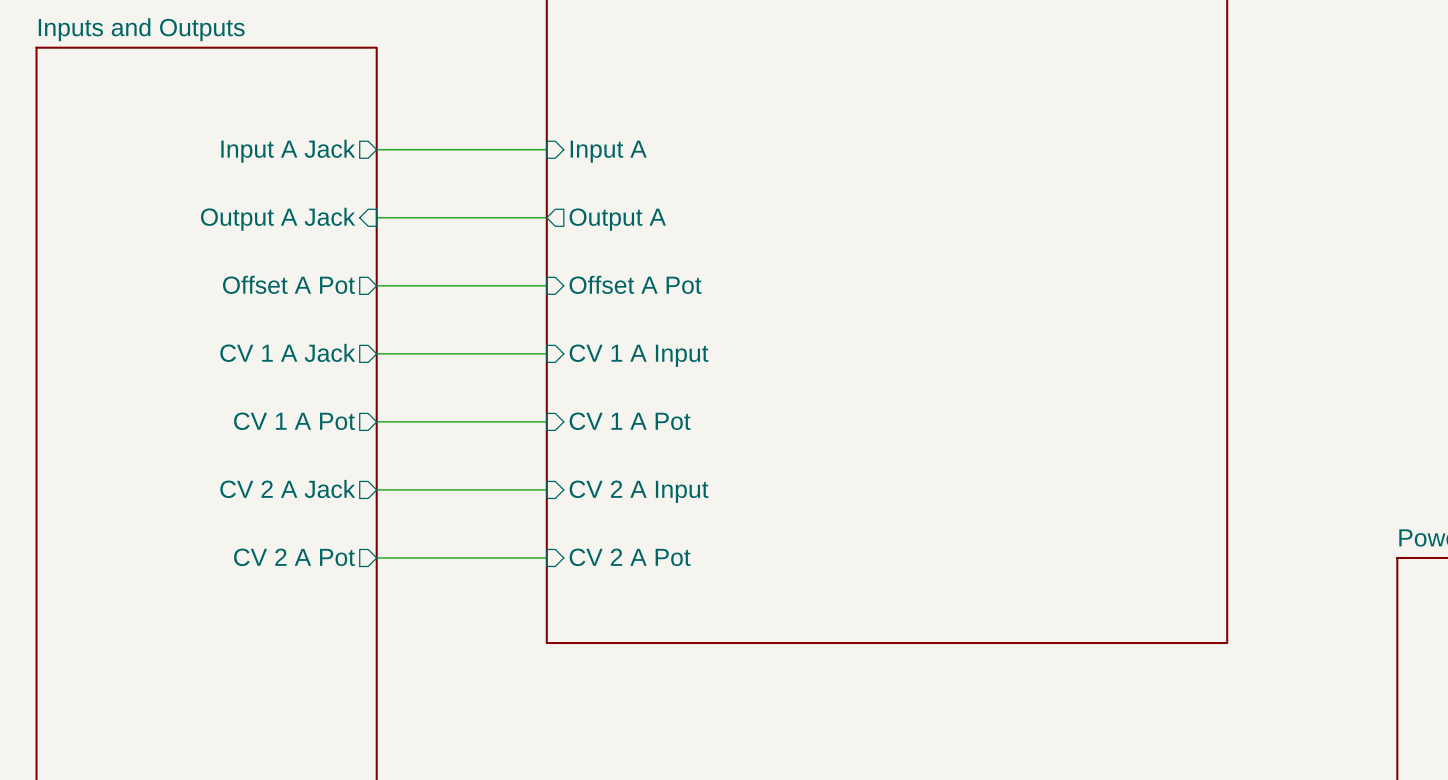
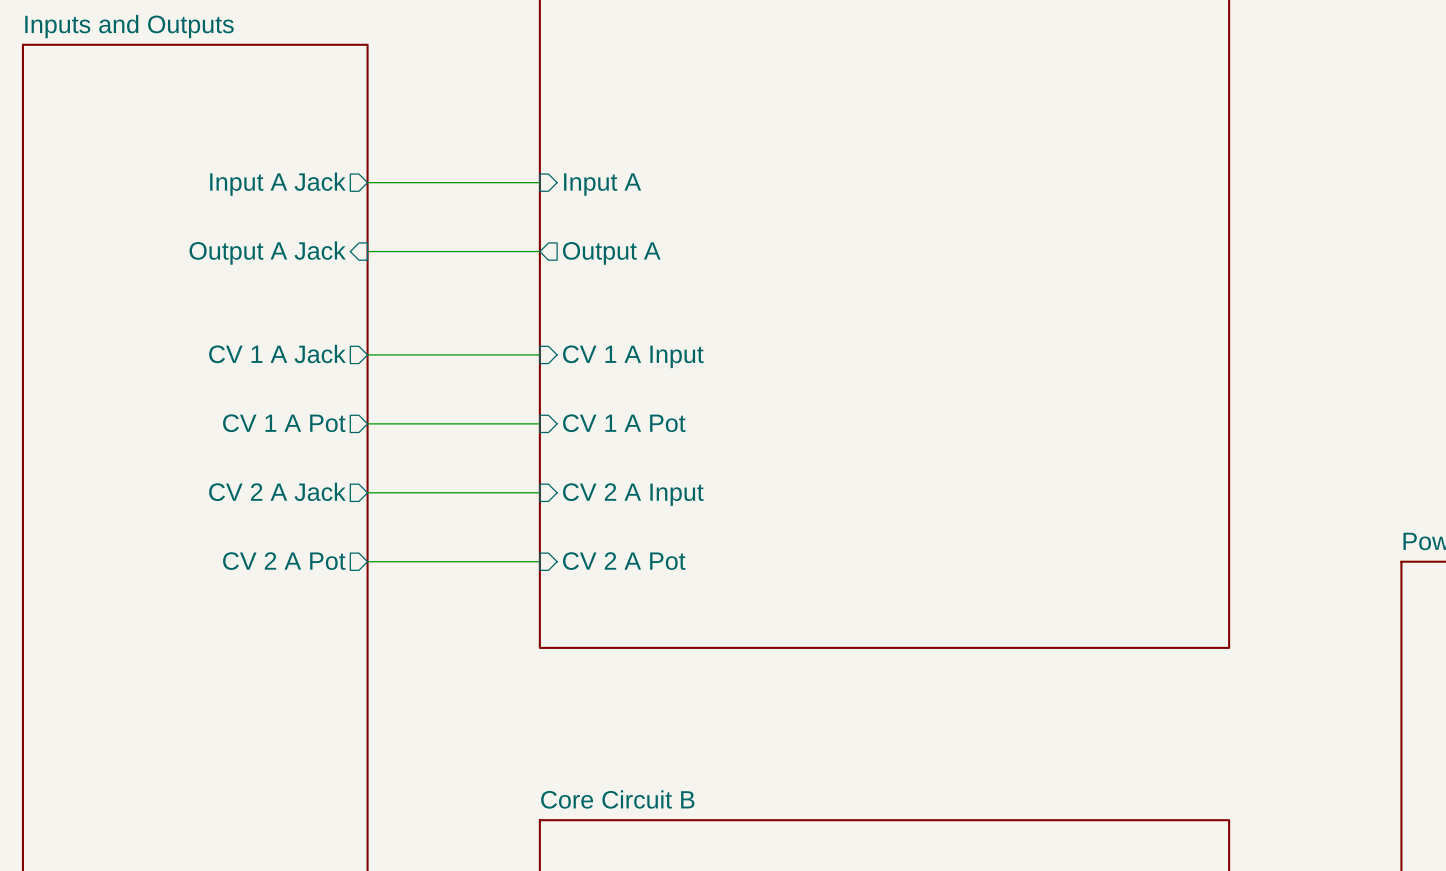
wire: (376, 149) (546, 149) -> (367, 182) (539, 182)
sheet pin position: Input A Jack (288, 151) -> Input A Jack (277, 184)
sheet pin position: Input A (608, 151) -> Input A (602, 184)
wire: (376, 217) (546, 217) -> none
sheet pin position: Output A Jack (278, 219) -> Output A Jack (267, 253)
sheet pin position: Output A (617, 219) -> Output A (611, 253)
sheet pin: Offset A Pot (288, 284) -> none
sheet pin: Offset A Pot (635, 284) -> none
wire: (376, 285) (546, 285) -> (367, 251) (539, 251)

